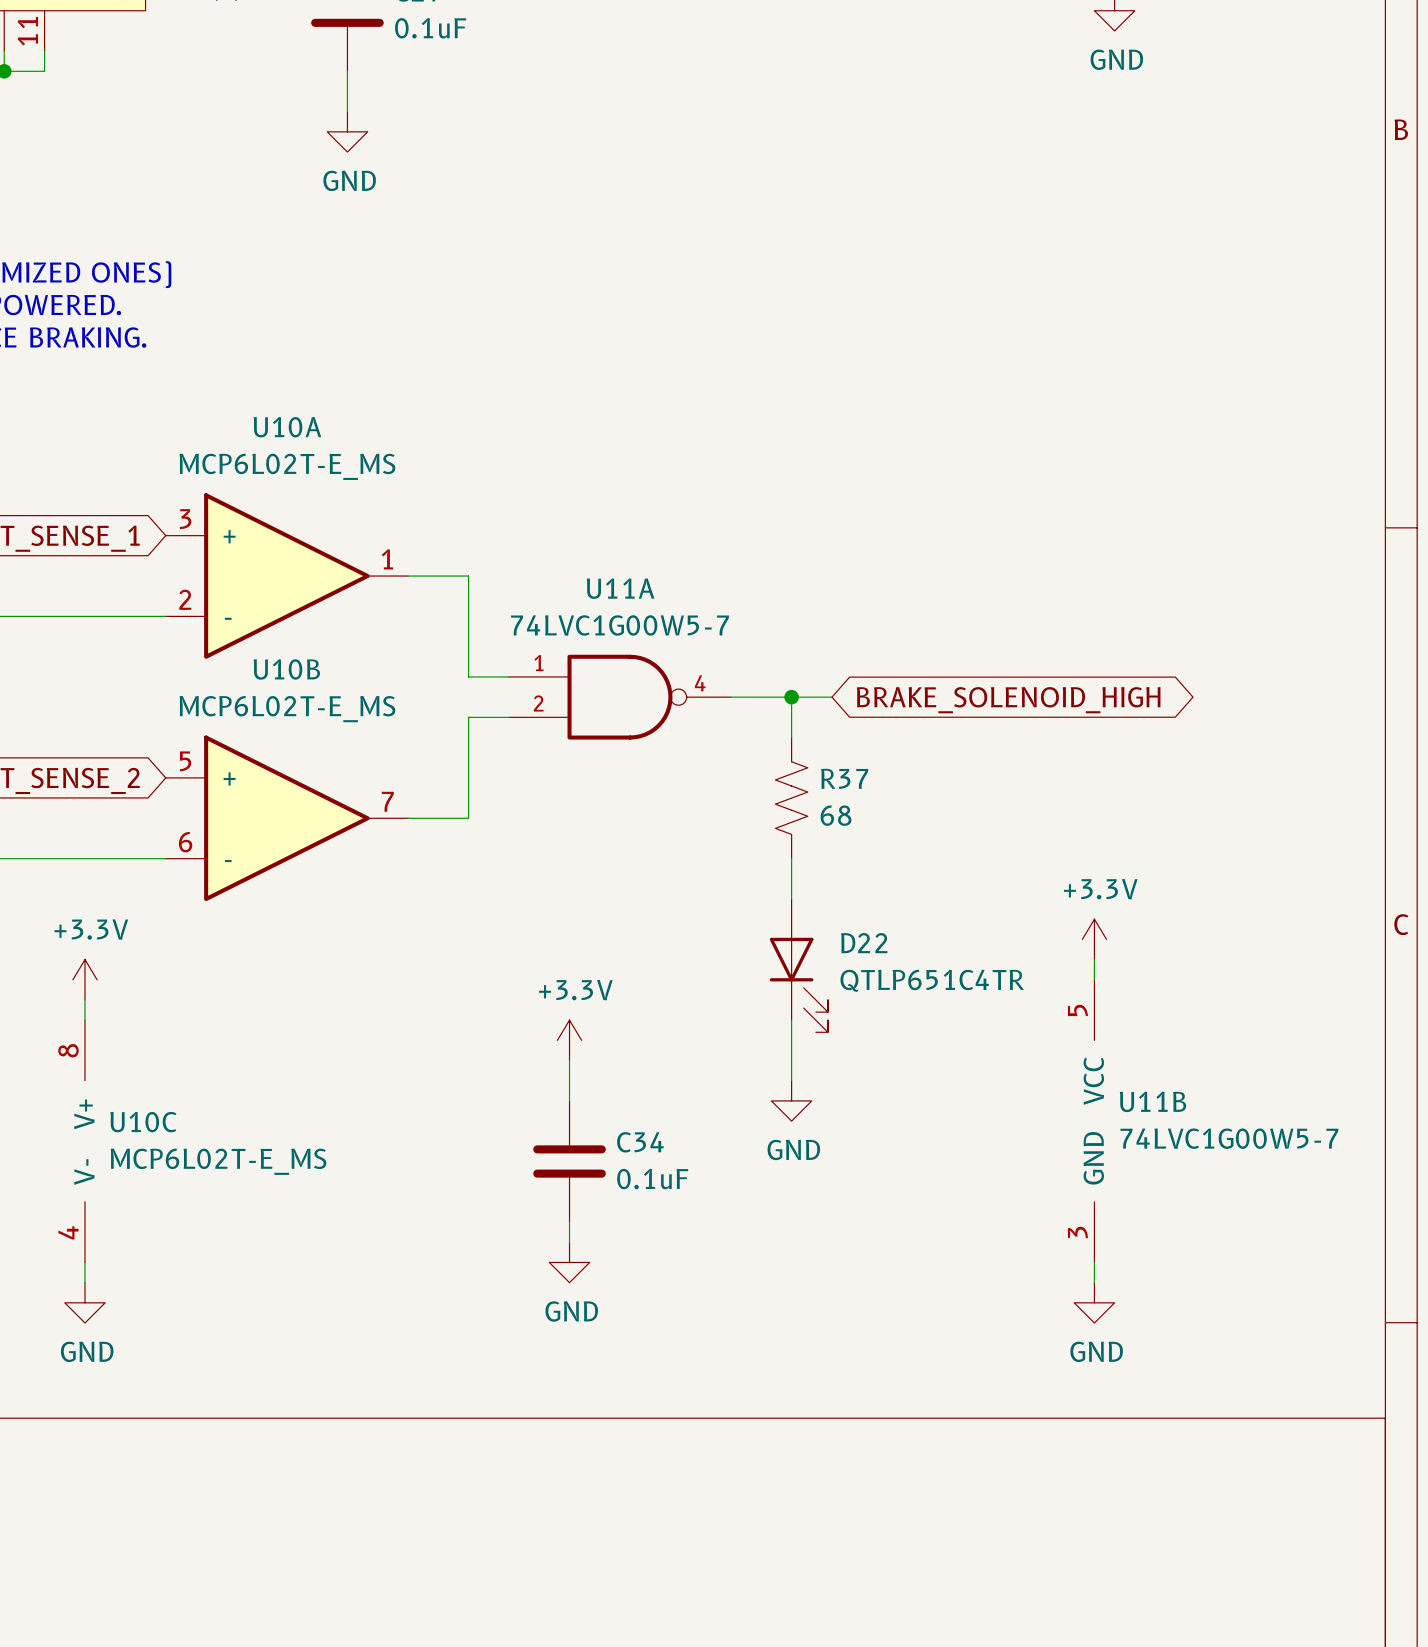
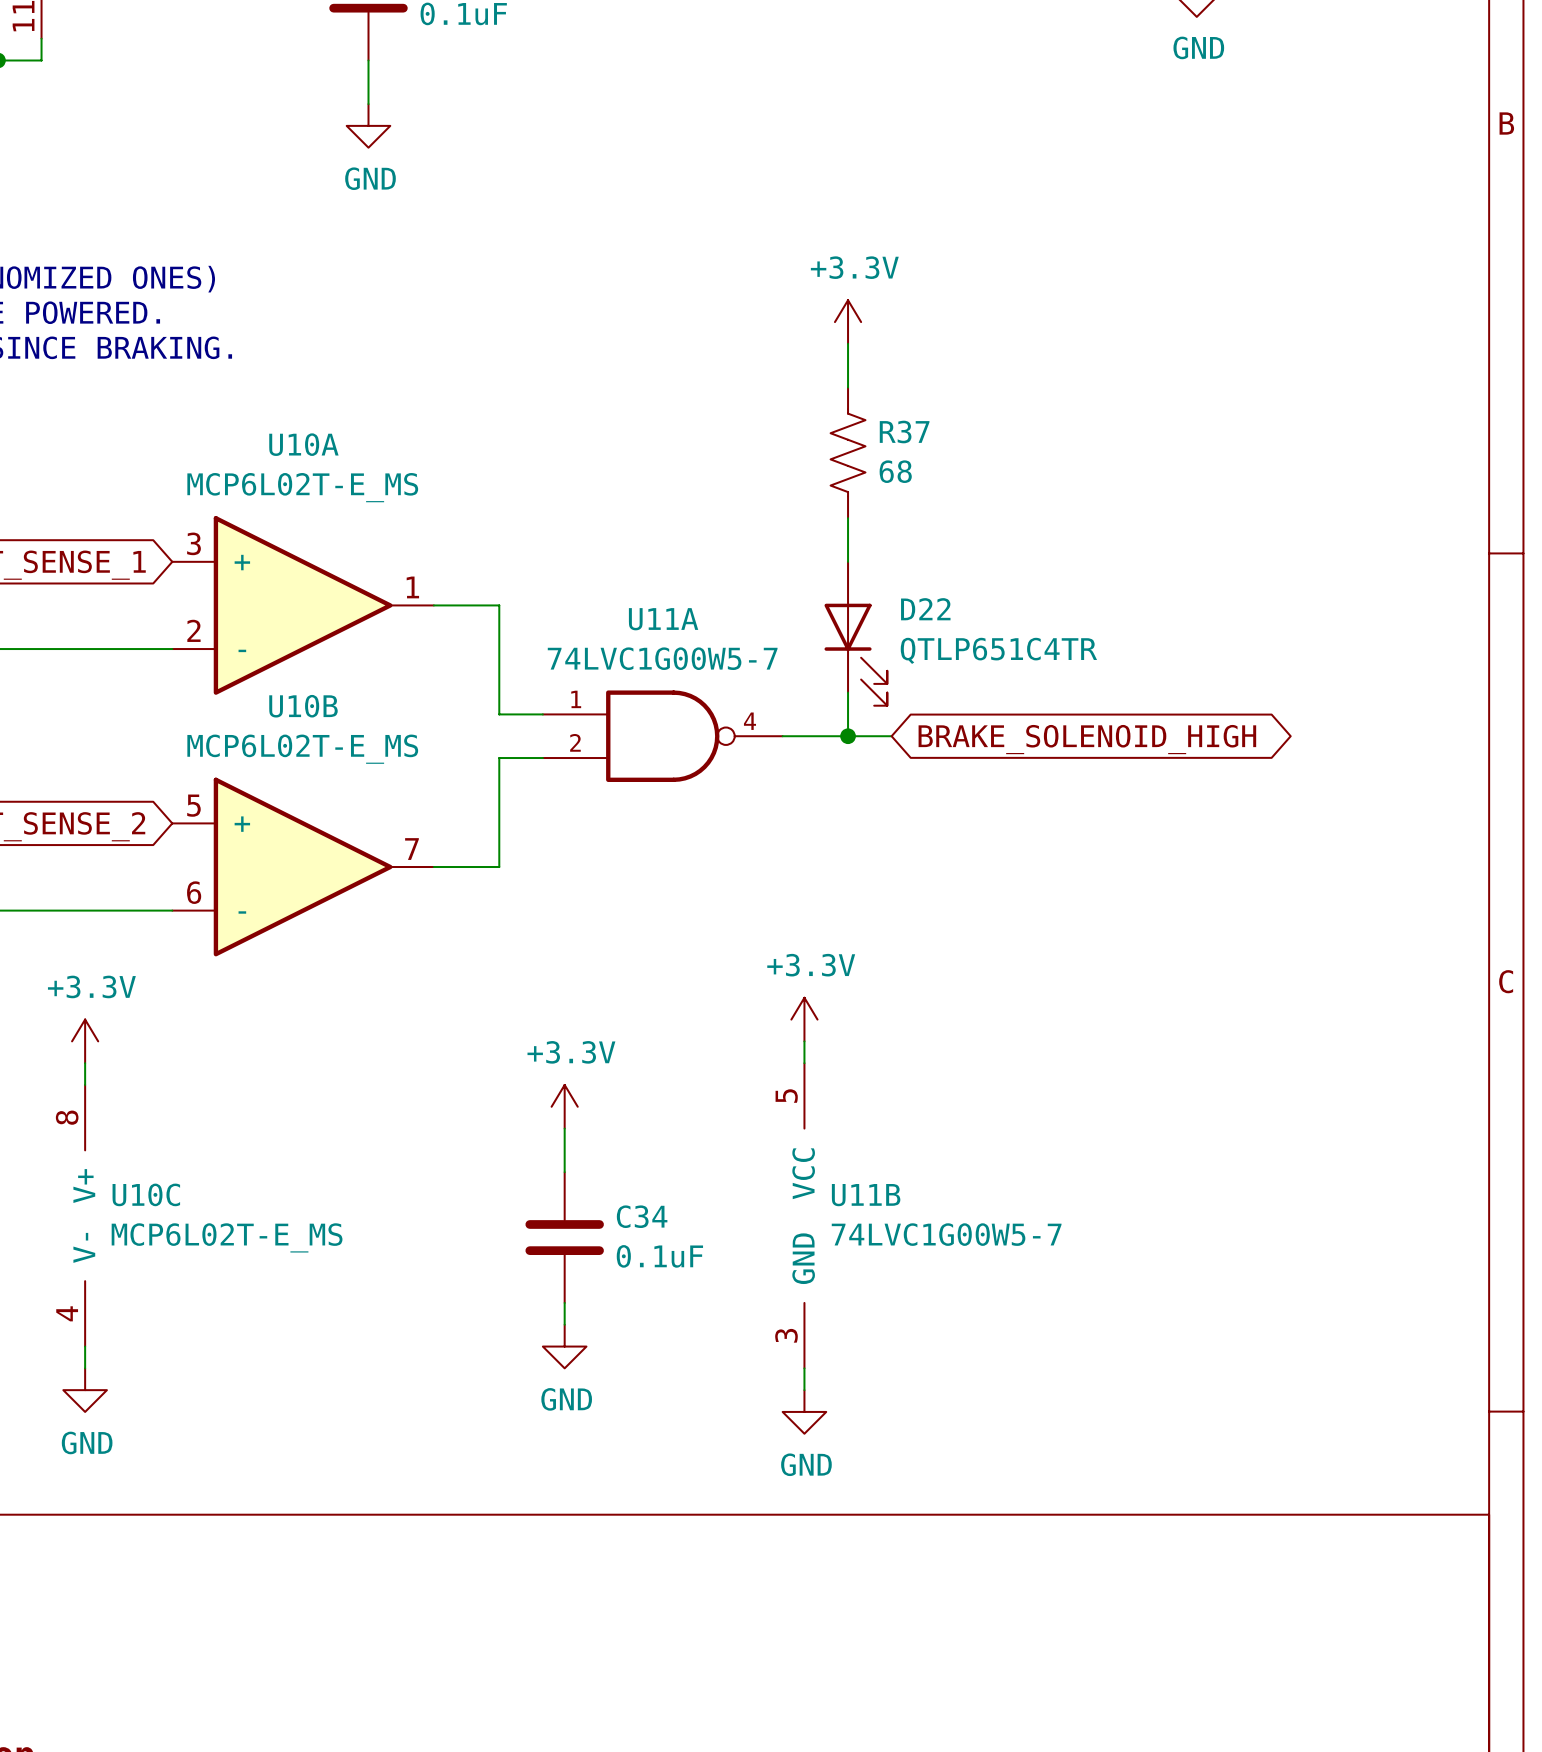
power symbol: none -> +3.3V (848, 322)
wire: none -> (848, 343) (848, 387)
wire: (791, 697) (791, 737) -> (848, 736) (848, 692)
R37 position: (791, 798) -> (848, 452)
wire: (791, 858) (791, 899) -> (848, 518) (848, 561)
power symbol: +3.3V (1094, 939) -> none
power symbol: none -> +3.3V (804, 1019)
wire: (1094, 959) (1094, 979) -> (804, 1041) (804, 1063)
D22 position: (798, 965) -> (855, 633)
wire: (791, 1020) (791, 1080) -> none
power symbol position: +3.3V (569, 1040) -> +3.3V (564, 1106)
wire: (569, 1060) (569, 1100) -> (564, 1128) (564, 1172)
power symbol: GND (791, 1100) -> none
U11B position: (1094, 1121) -> (804, 1215)
C34 position: (569, 1161) -> (564, 1237)
wire: (569, 1222) (569, 1242) -> (564, 1302) (564, 1324)
power symbol position: GND (569, 1262) -> GND (564, 1346)
wire: (1094, 1262) (1094, 1282) -> (804, 1368) (804, 1390)
power symbol: GND (1094, 1302) -> none
power symbol: none -> GND (804, 1411)

